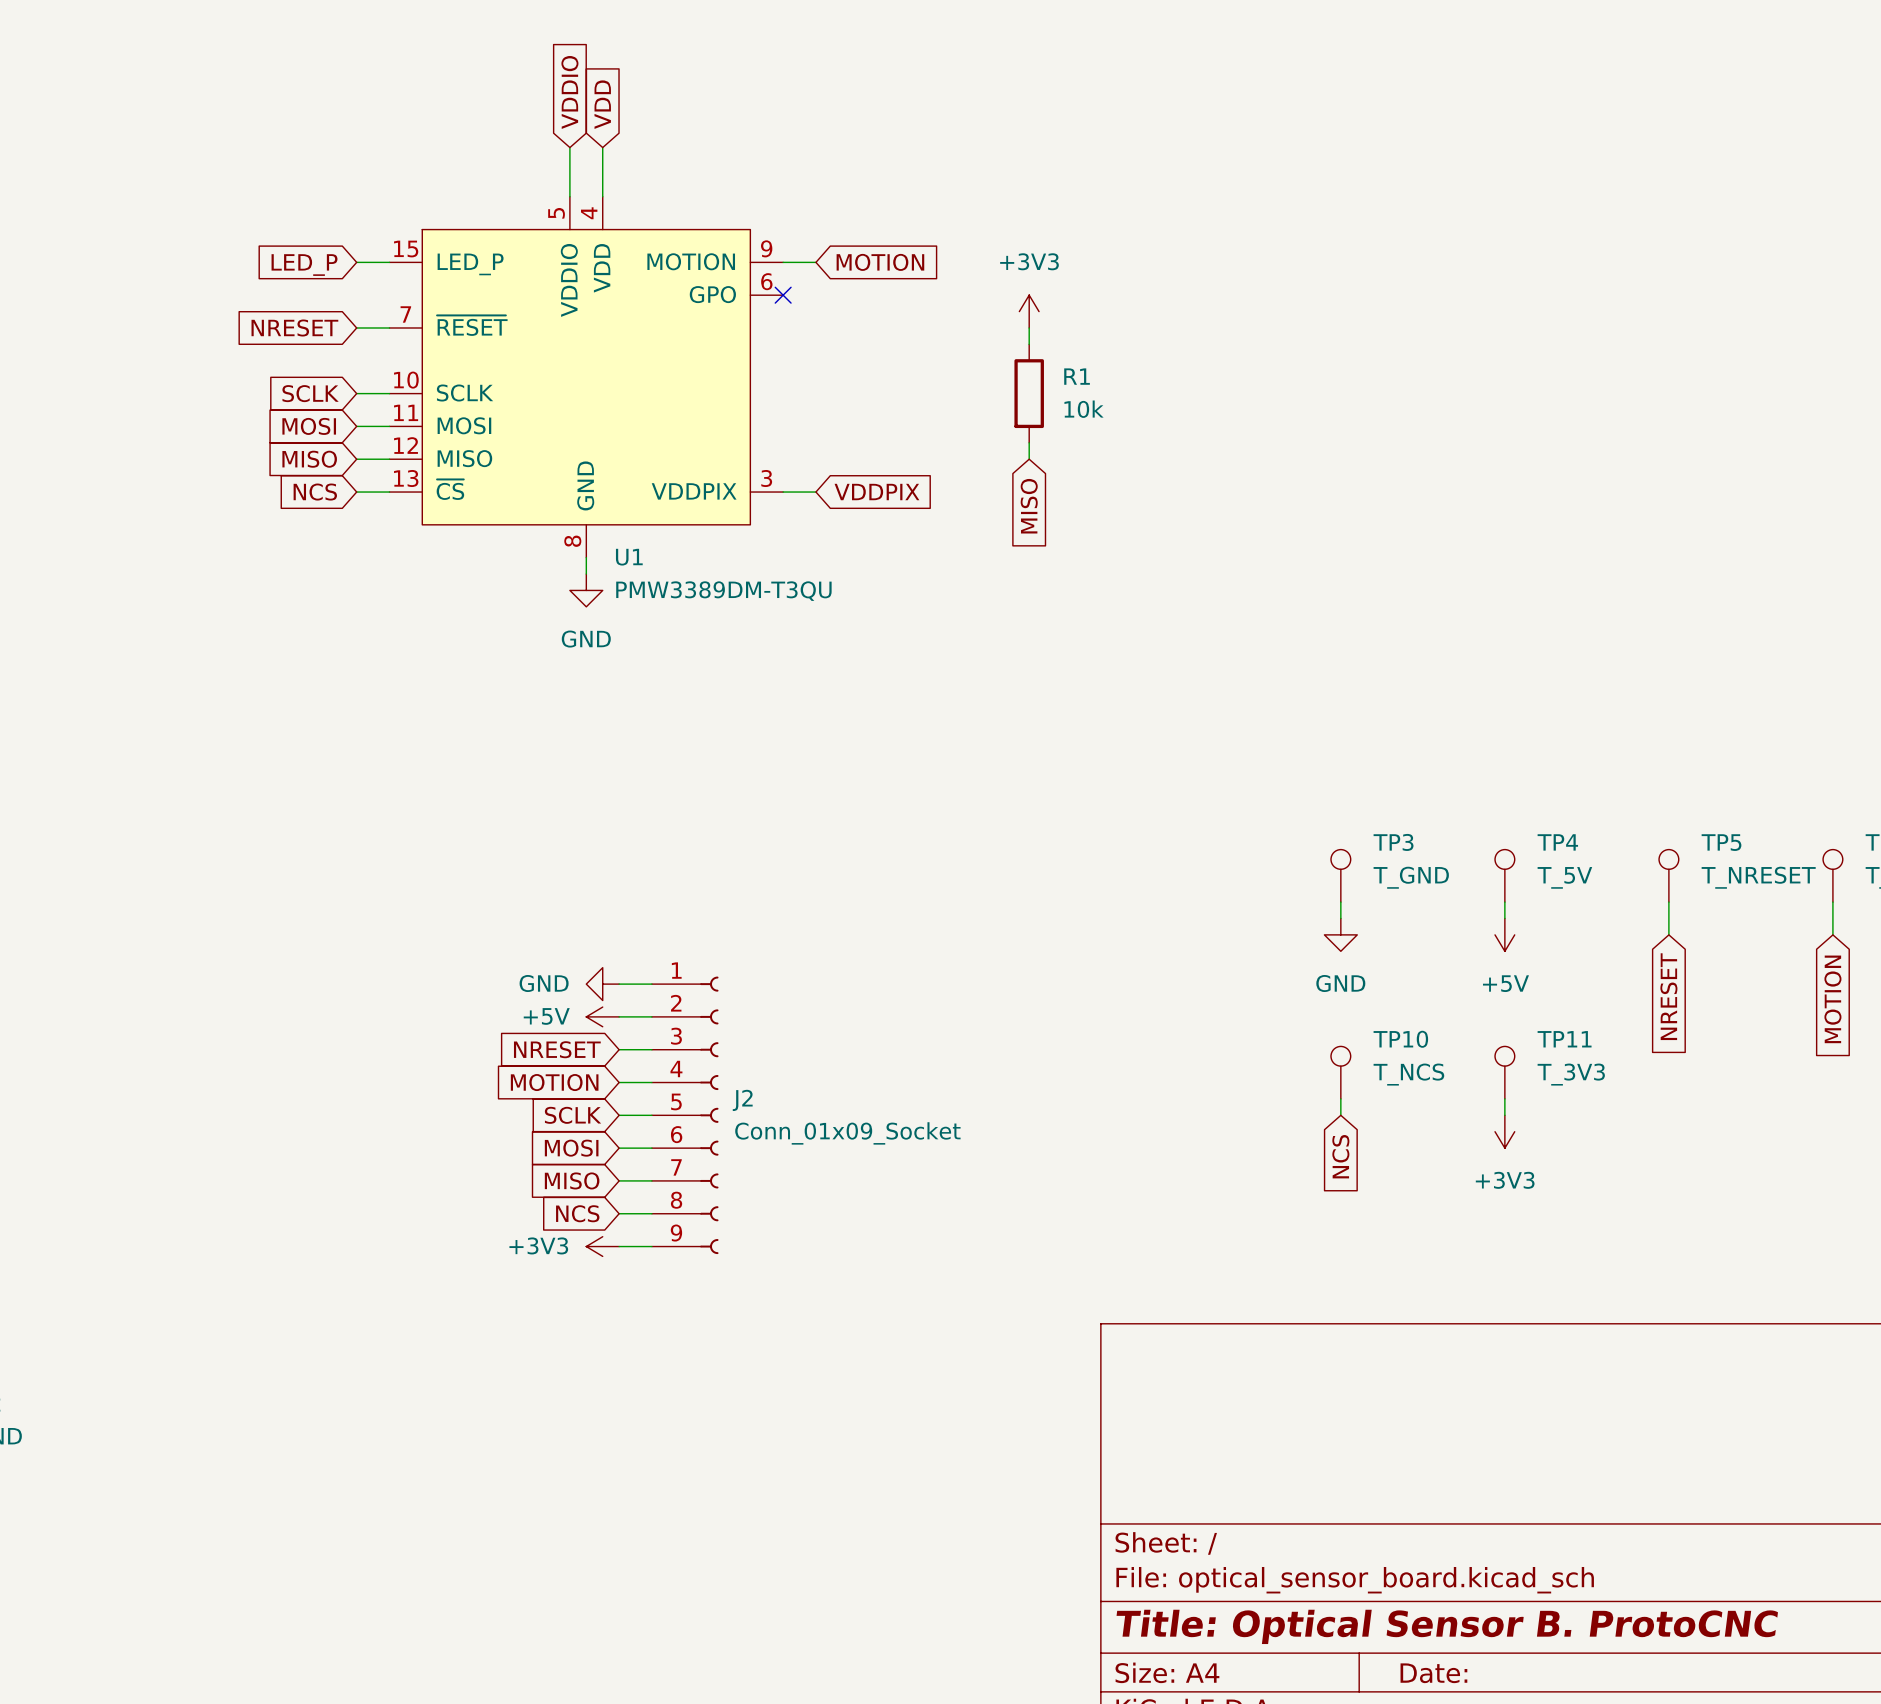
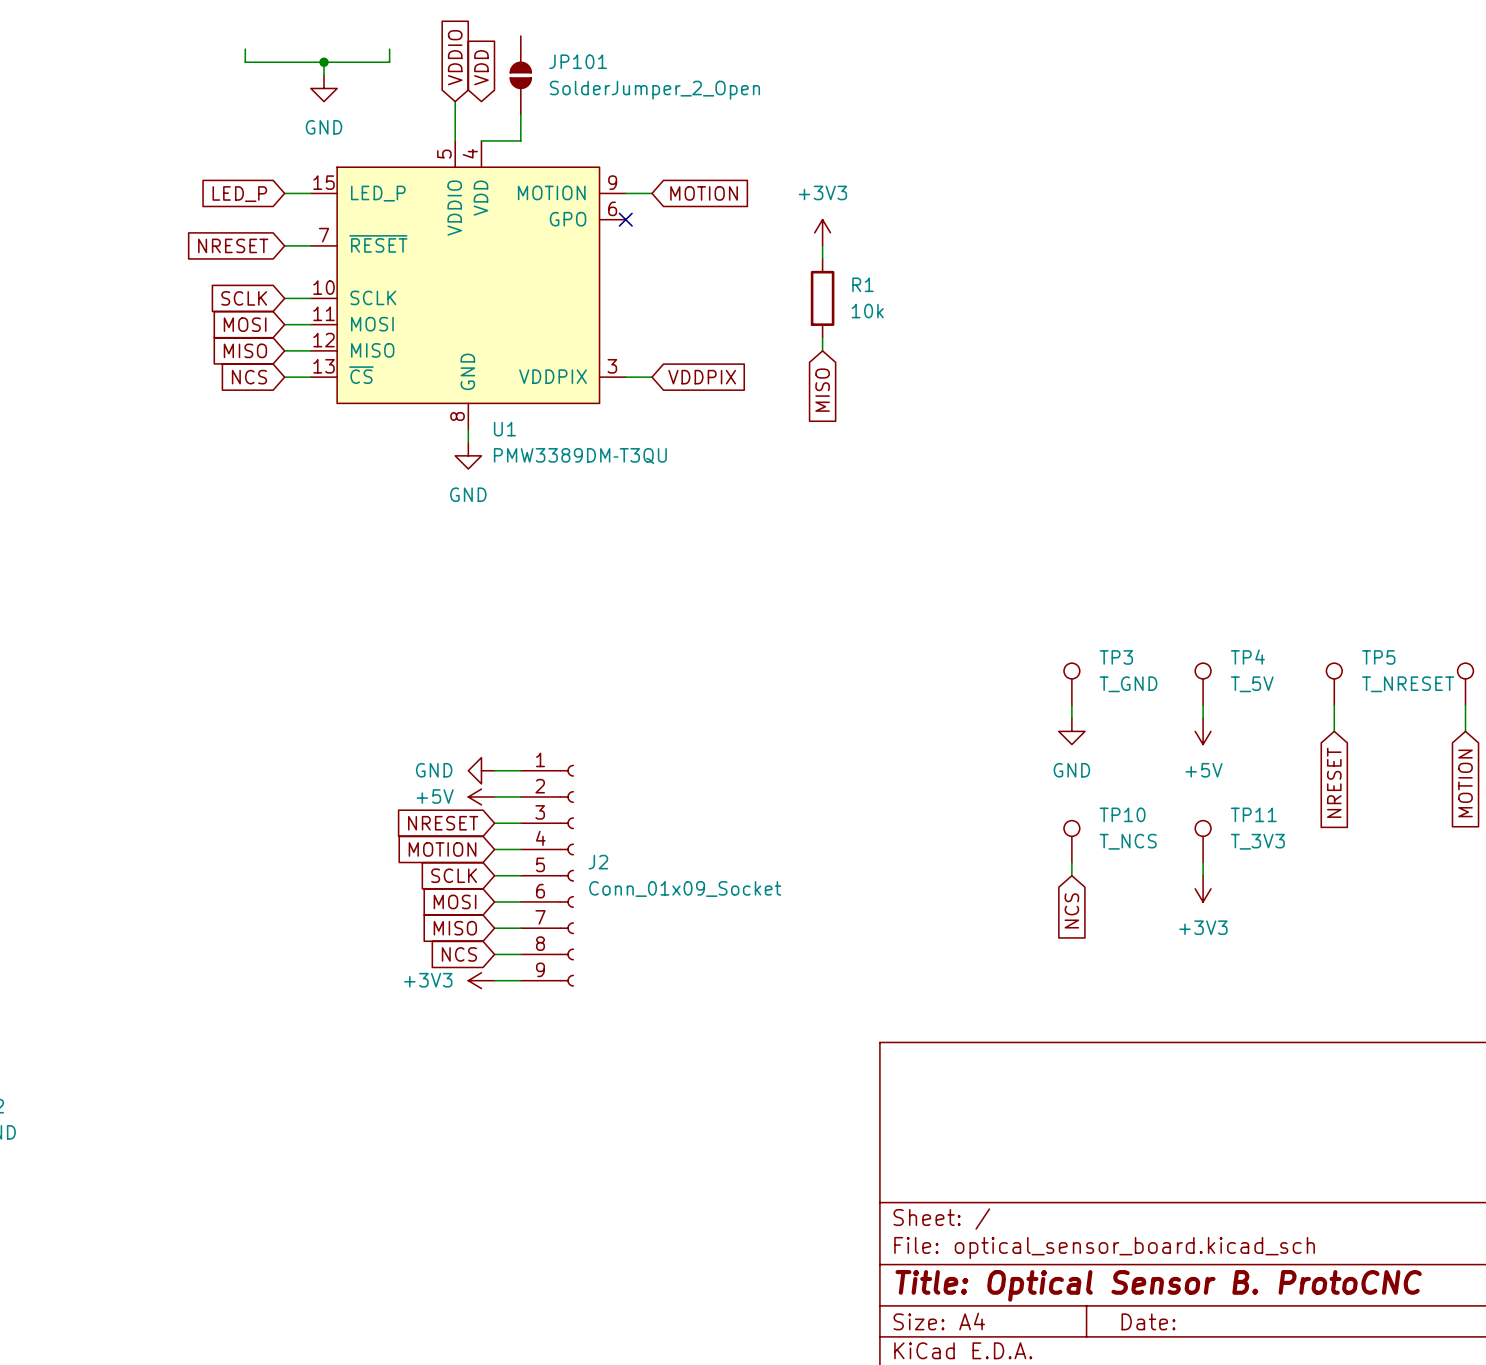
wire: none -> (245, 49) (245, 62) (389, 62) (389, 49)
wire: none -> (324, 62) (324, 75)
junction: none -> (324, 62)
JP101: none -> SolderJumper_2_Open (520, 75)
power symbol: none -> GND (324, 88)
wire: (602, 147) (602, 196) -> (520, 114) (520, 140) (481, 140)

